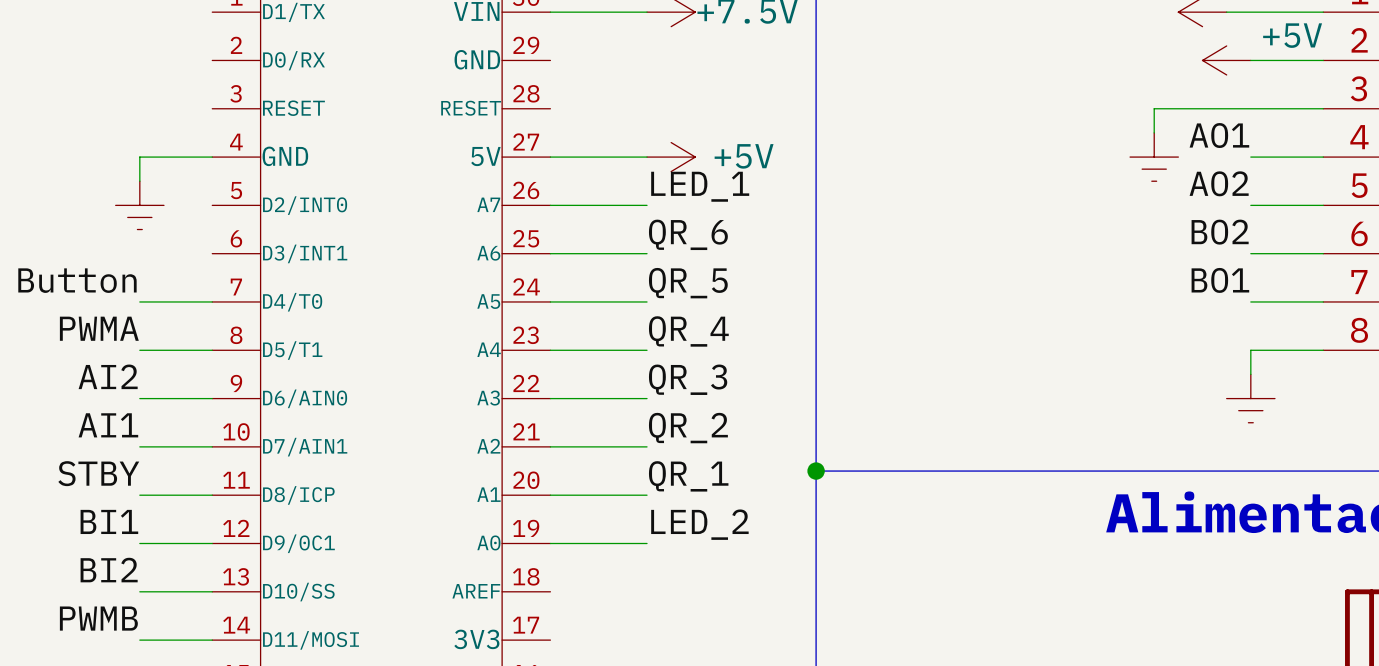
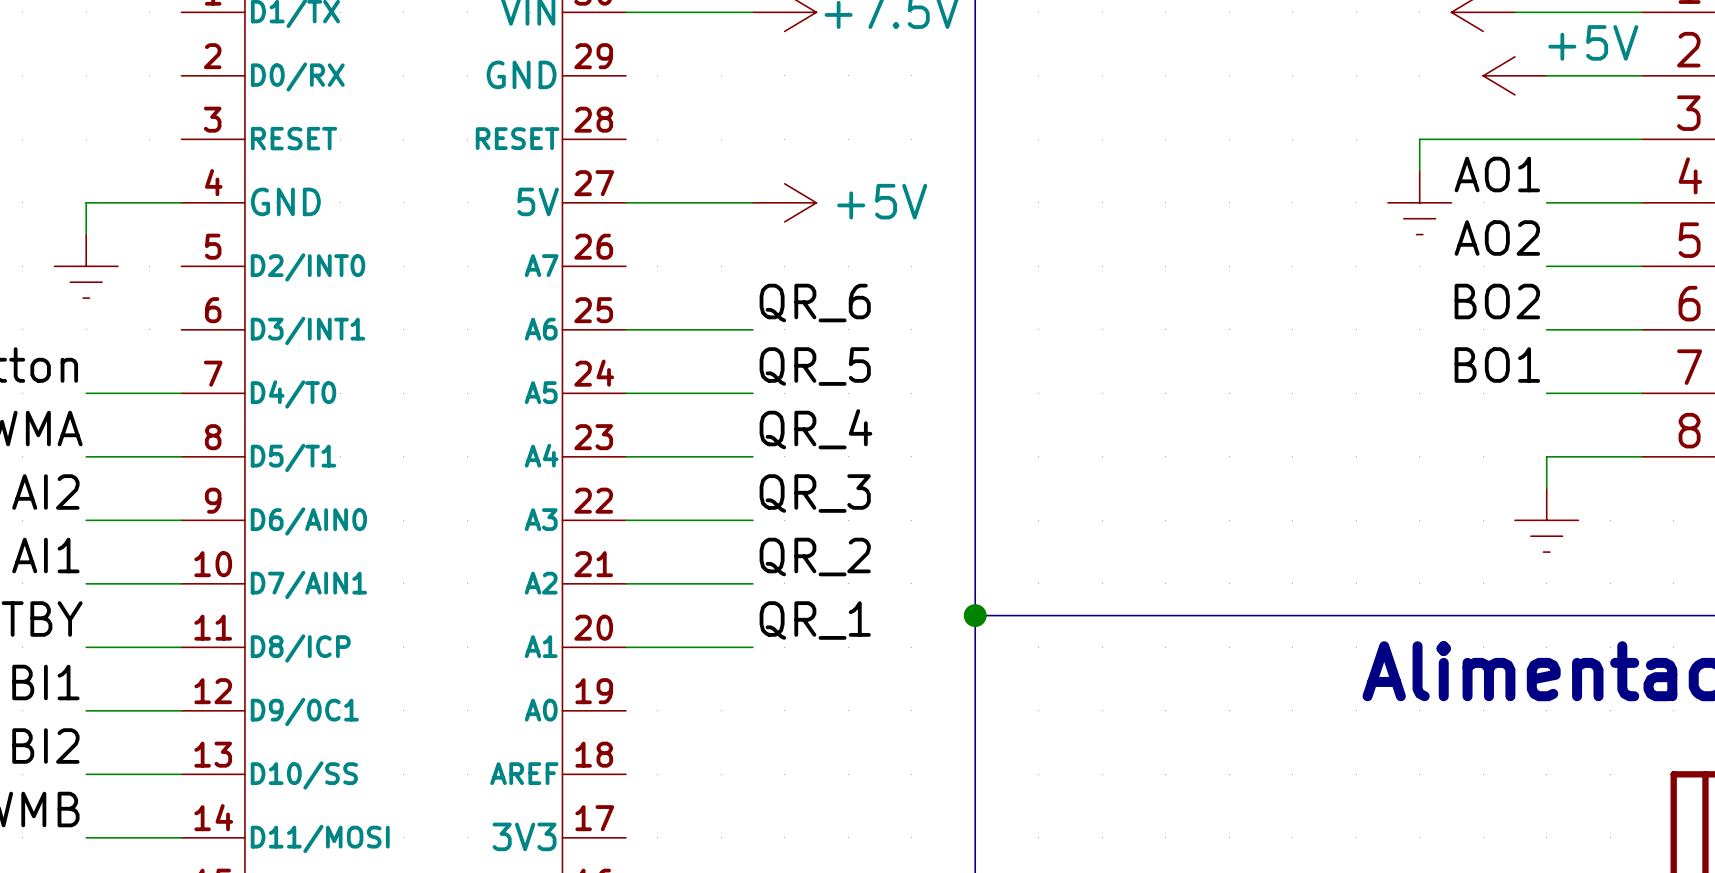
label: LED_1 (700, 186) -> none
wire: (550, 205) (647, 205) -> none
label: LED_2 (699, 524) -> none
wire: (550, 543) (647, 543) -> none

